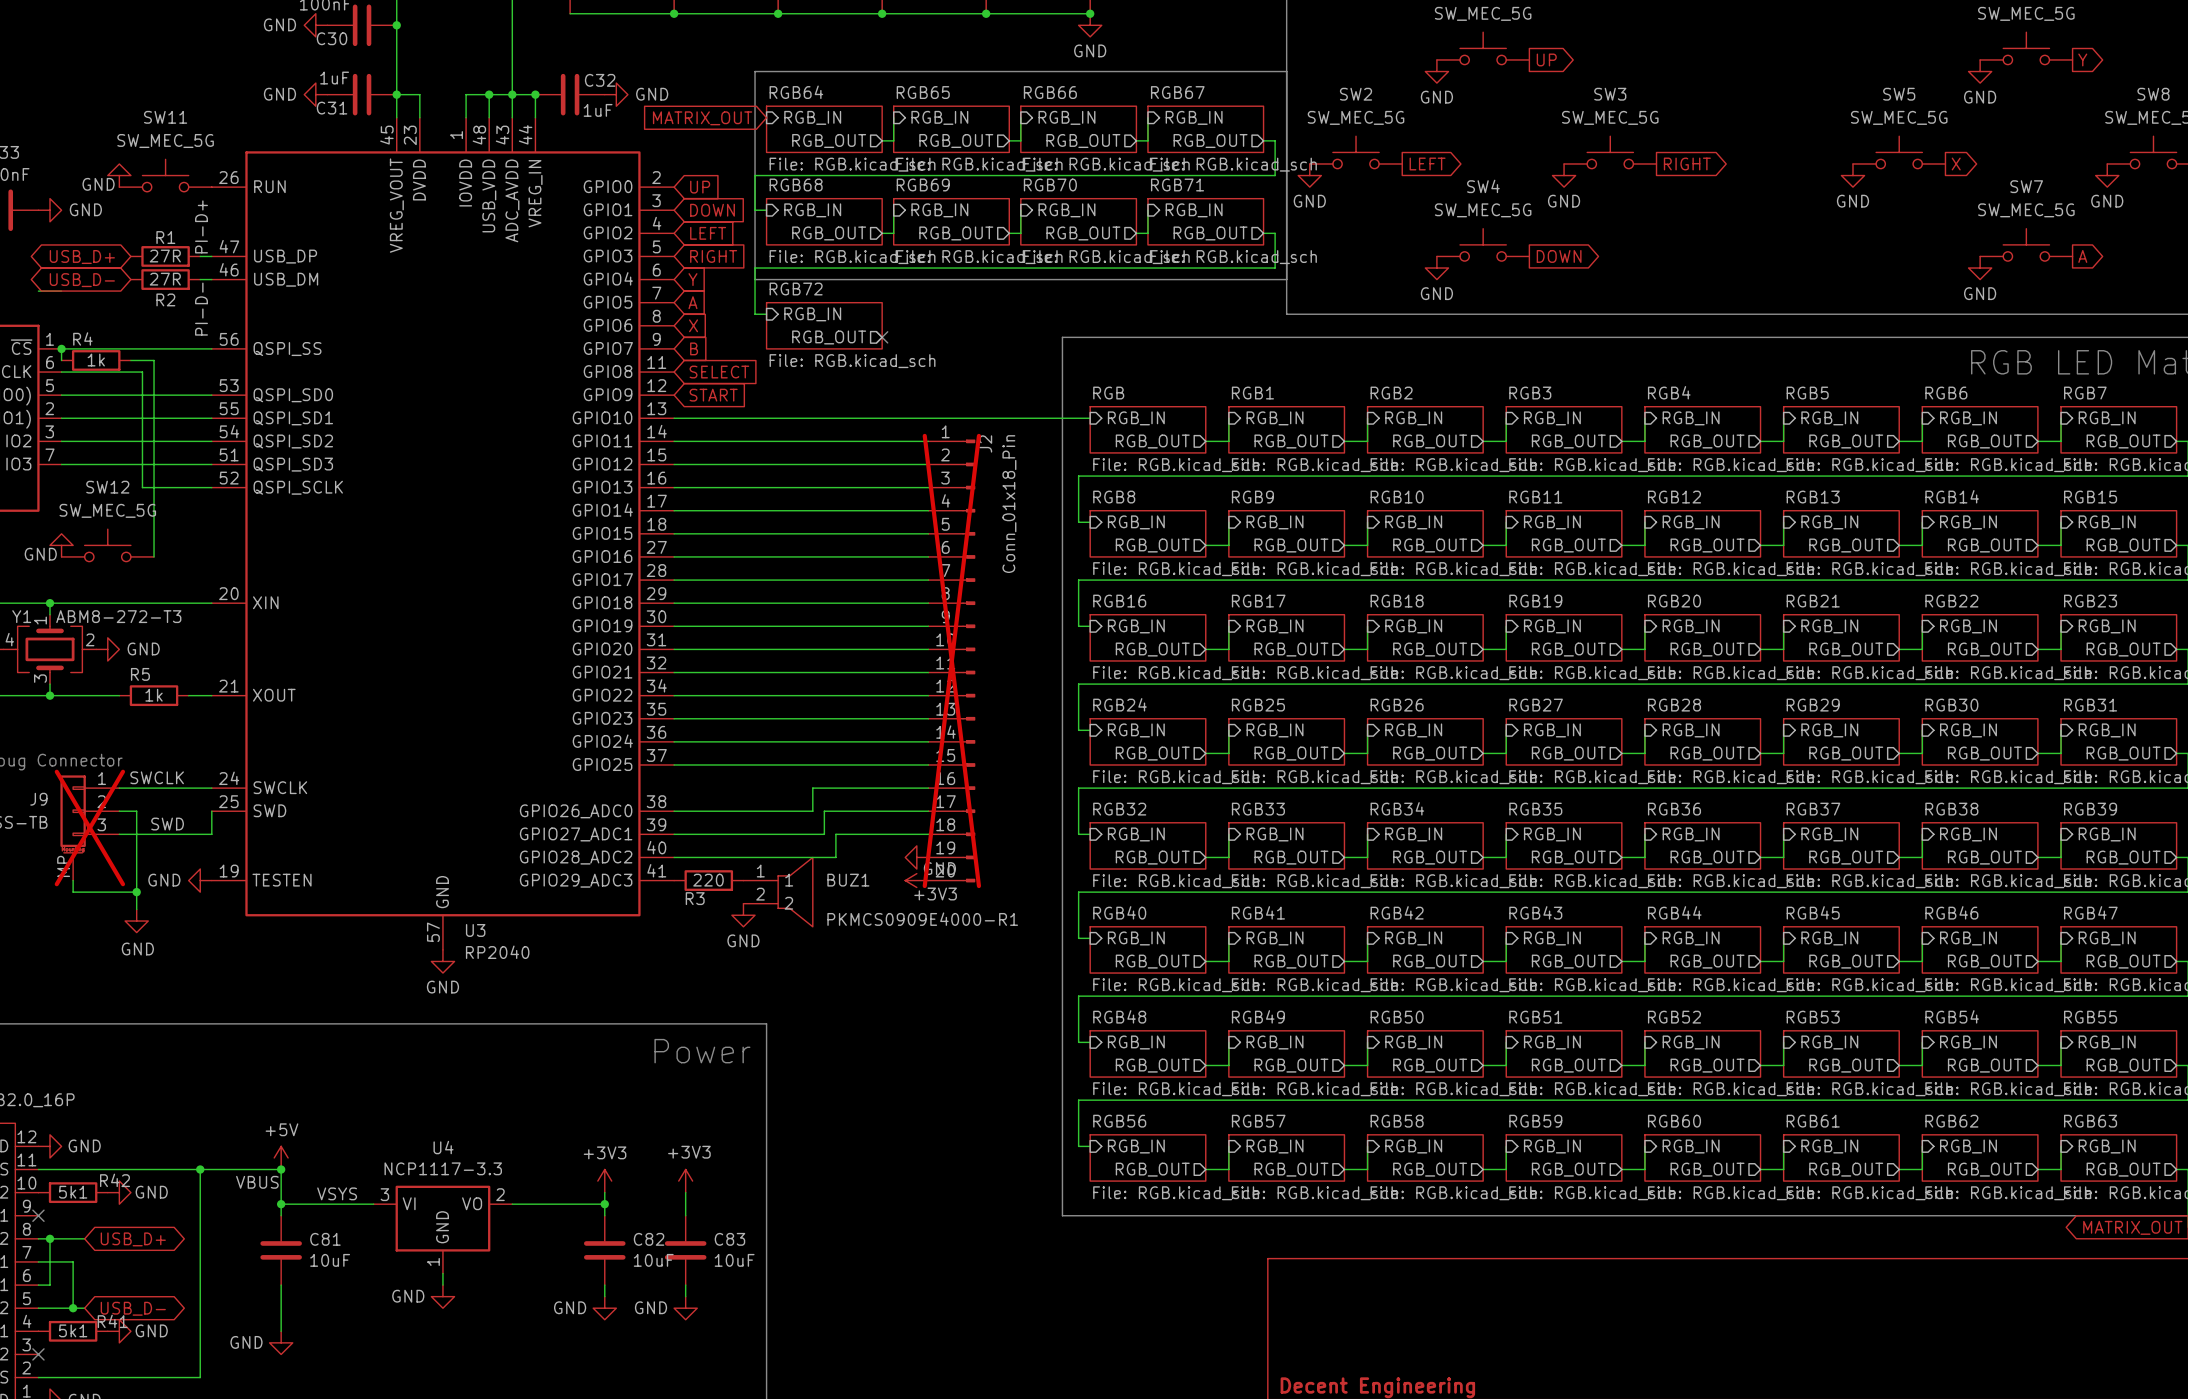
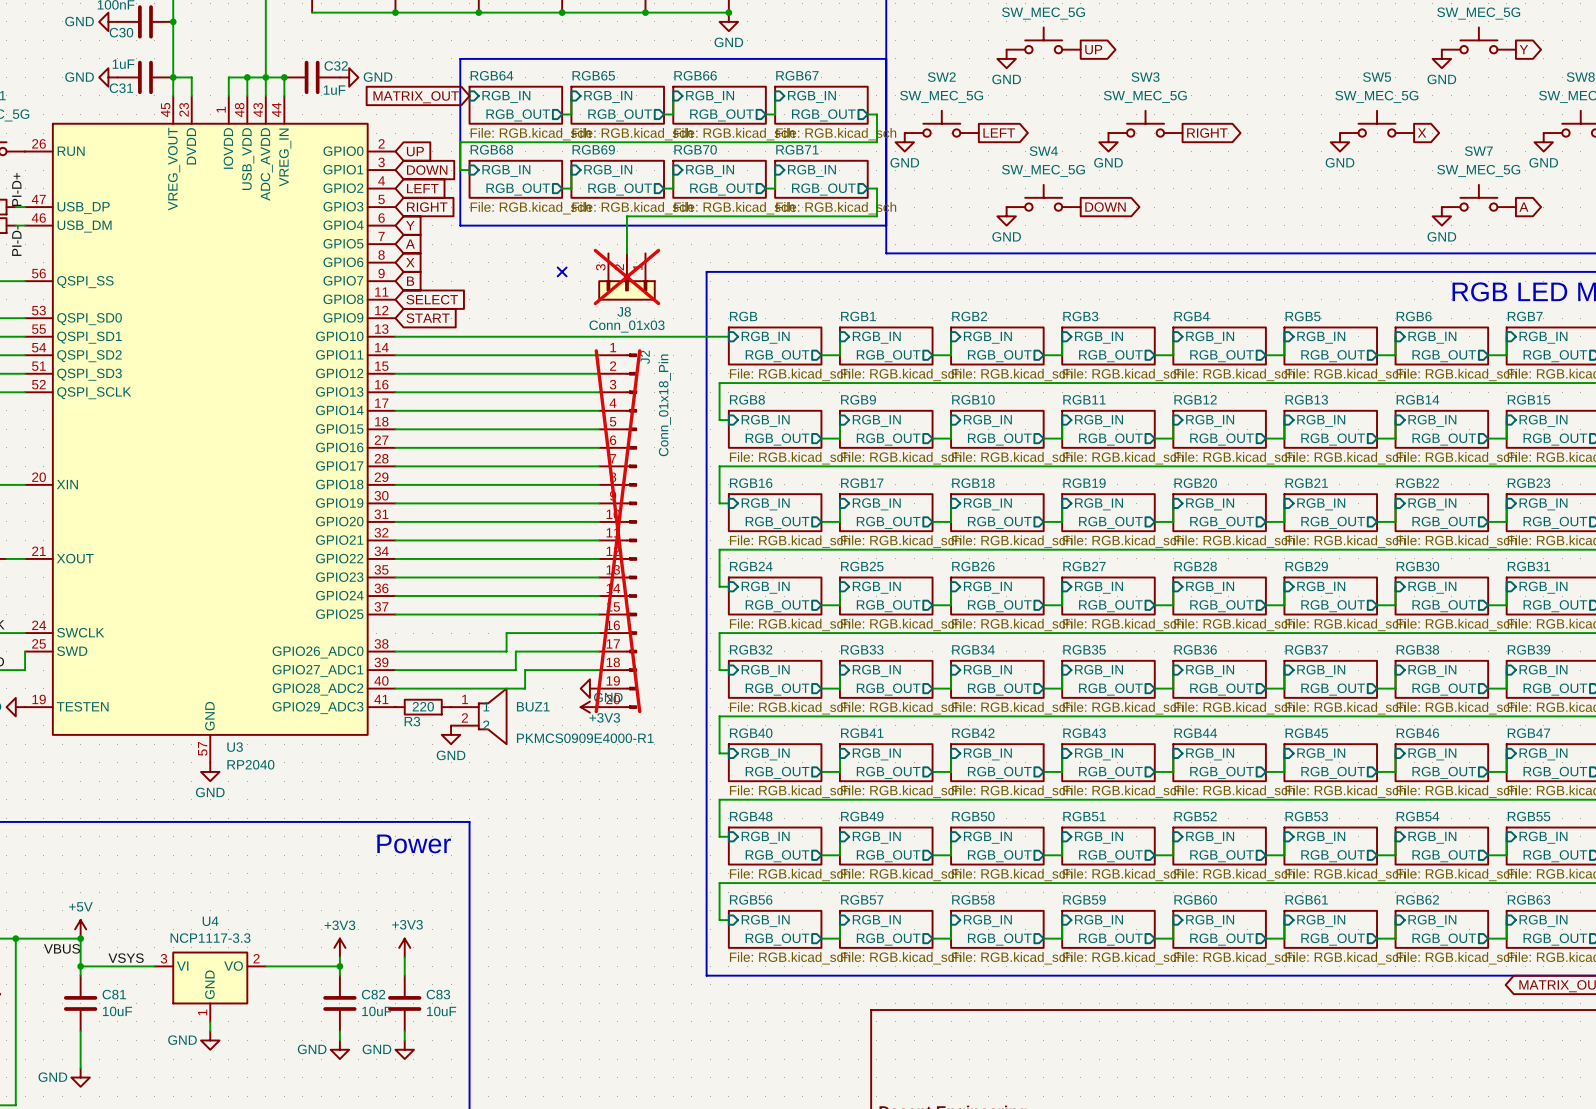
wire: (963, 268) (755, 268) (755, 314) (766, 314) -> (626, 216) (626, 253)
sheet pin: RGB_IN (812, 314) -> none
sheet RGB72: File: RGB.kicad_sch (824, 325) -> none
sheet pin: RGB_OUT (829, 337) -> none
J8: none -> Conn_01x03 (626, 277)

